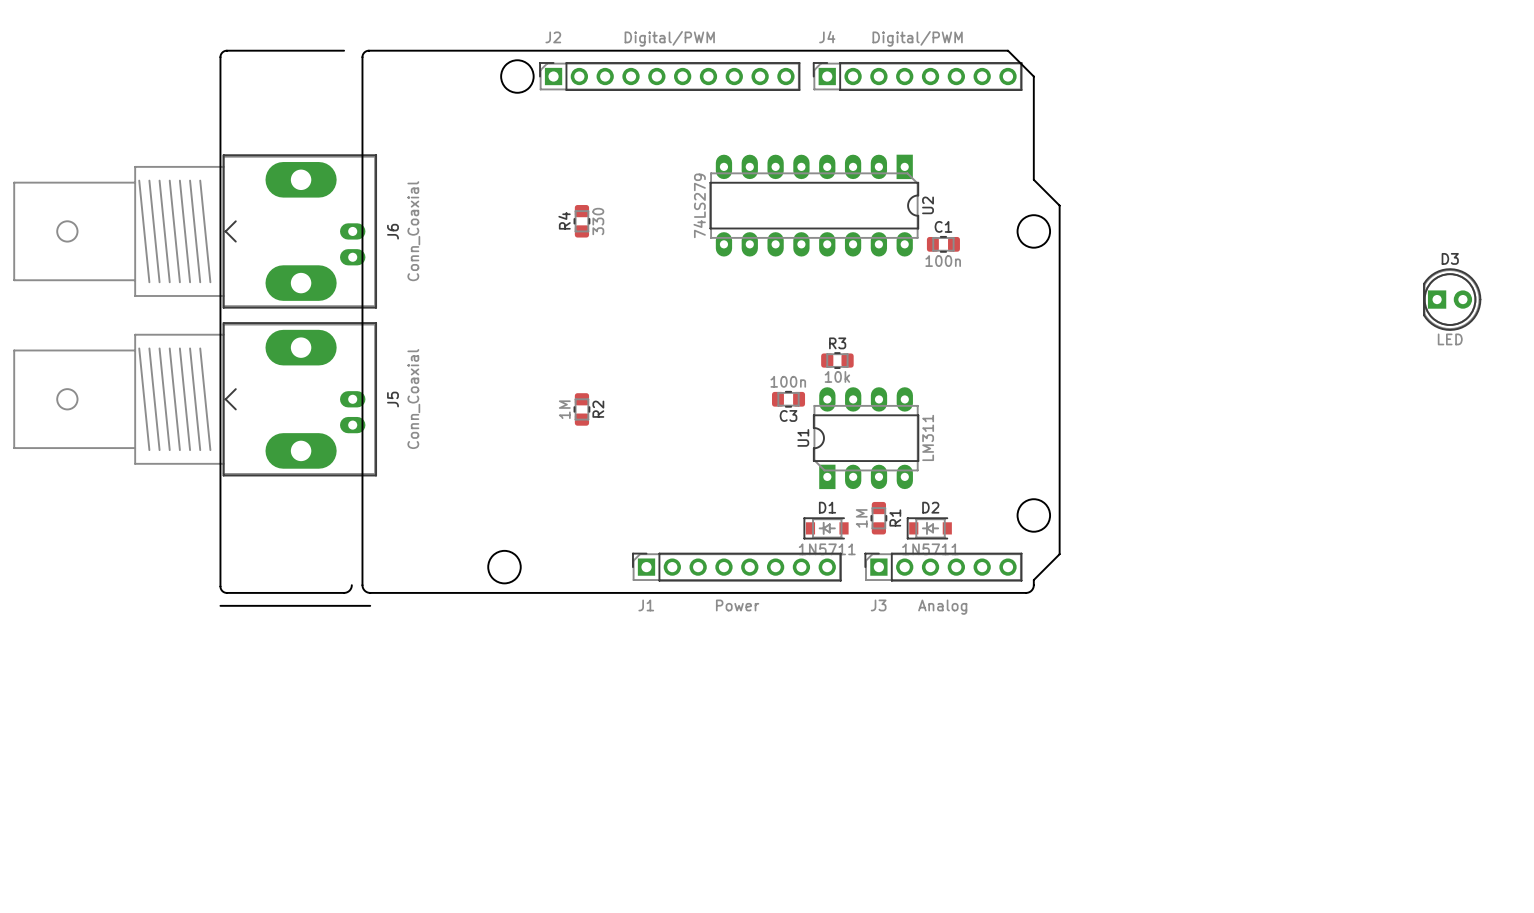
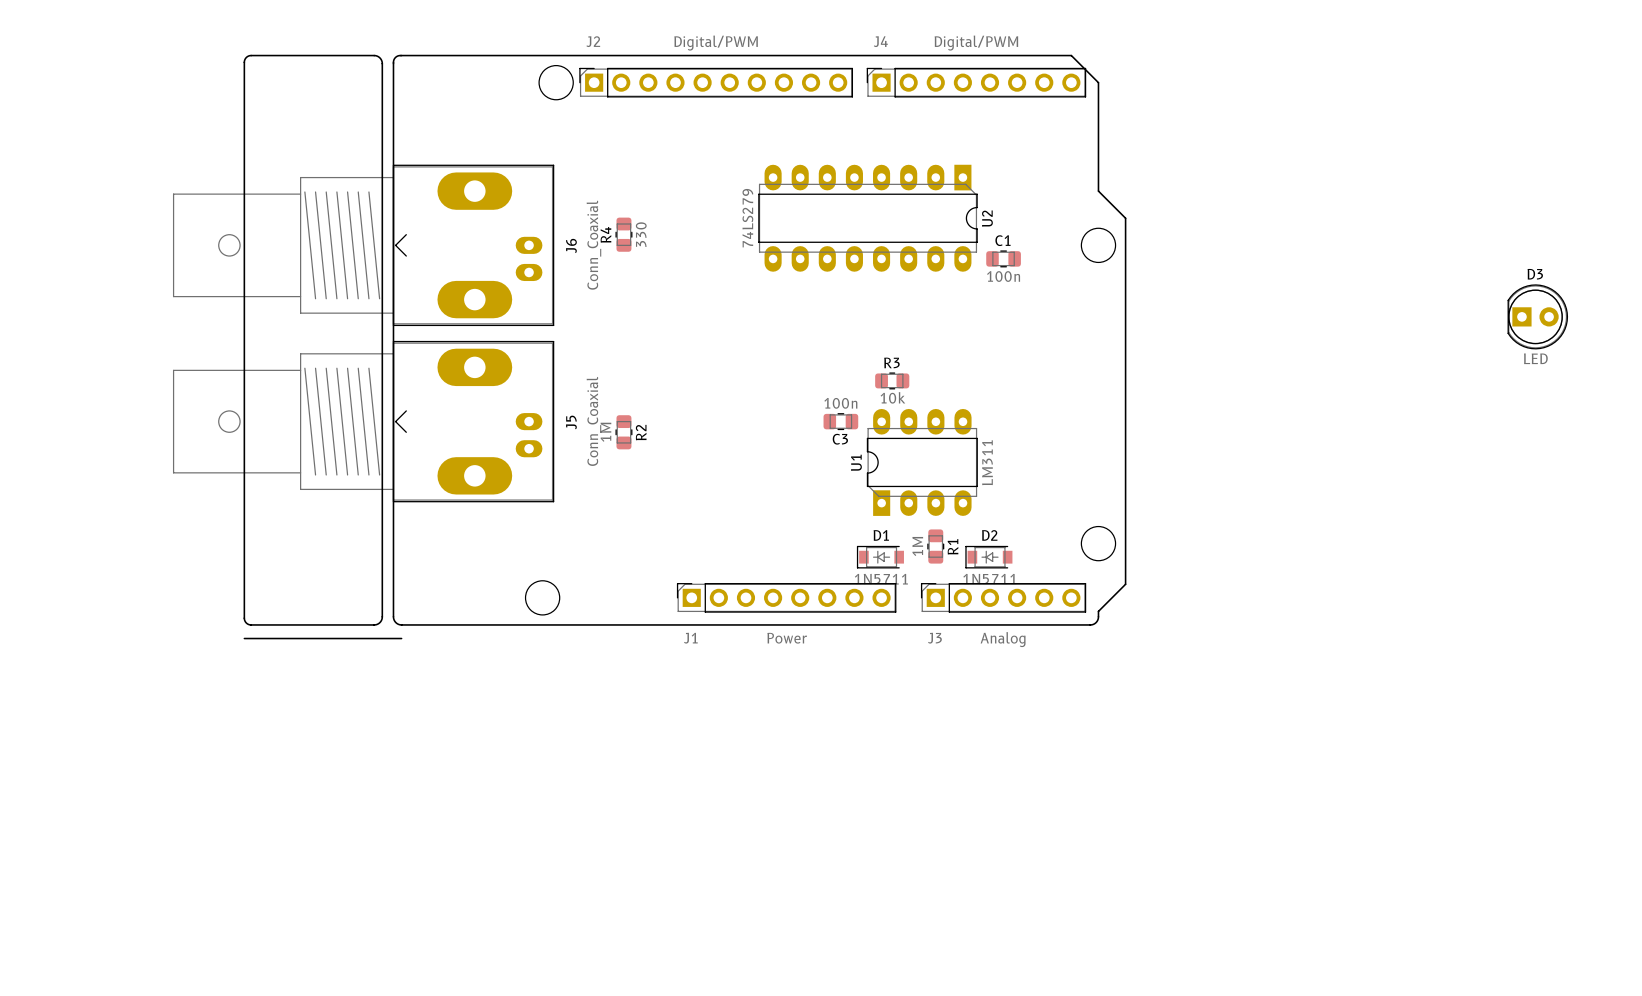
board edge: none -> (374, 55) (379, 57) (382, 63) (382, 616)
J6 position: (195, 231) -> (363, 245)
J5 position: (195, 399) -> (363, 421)

